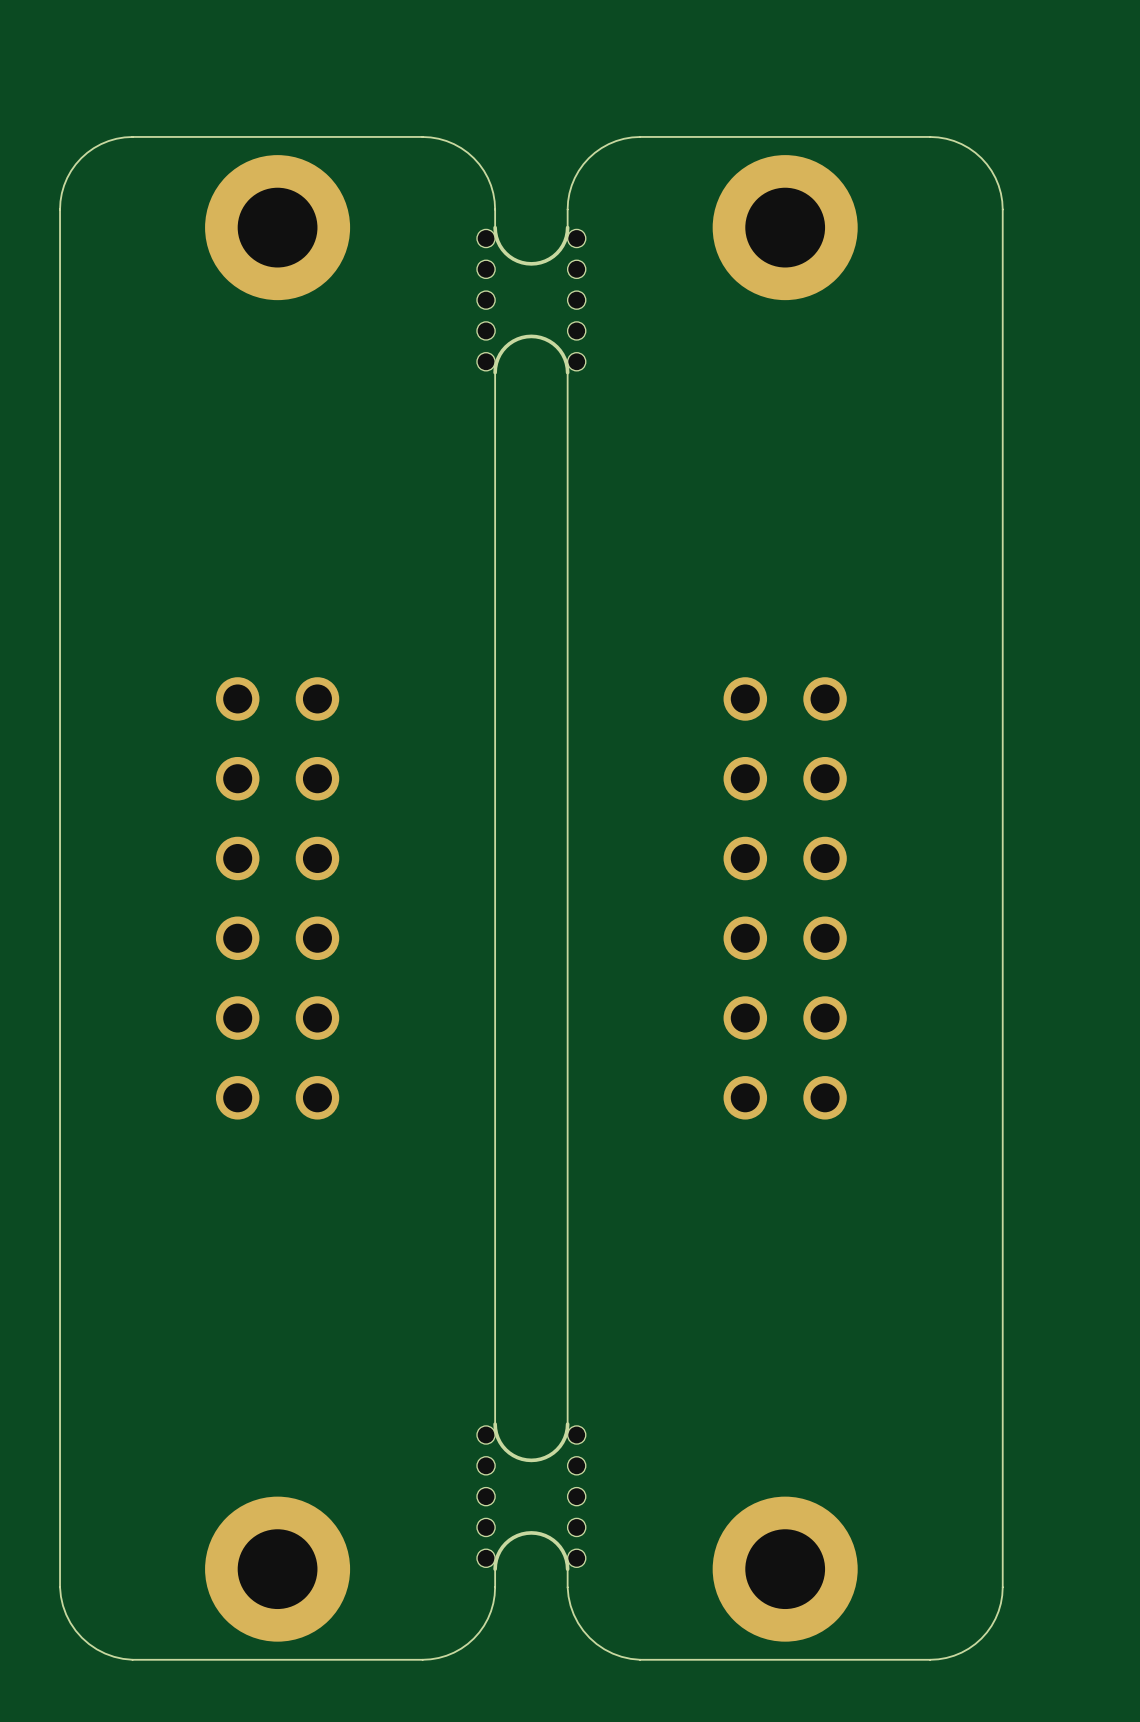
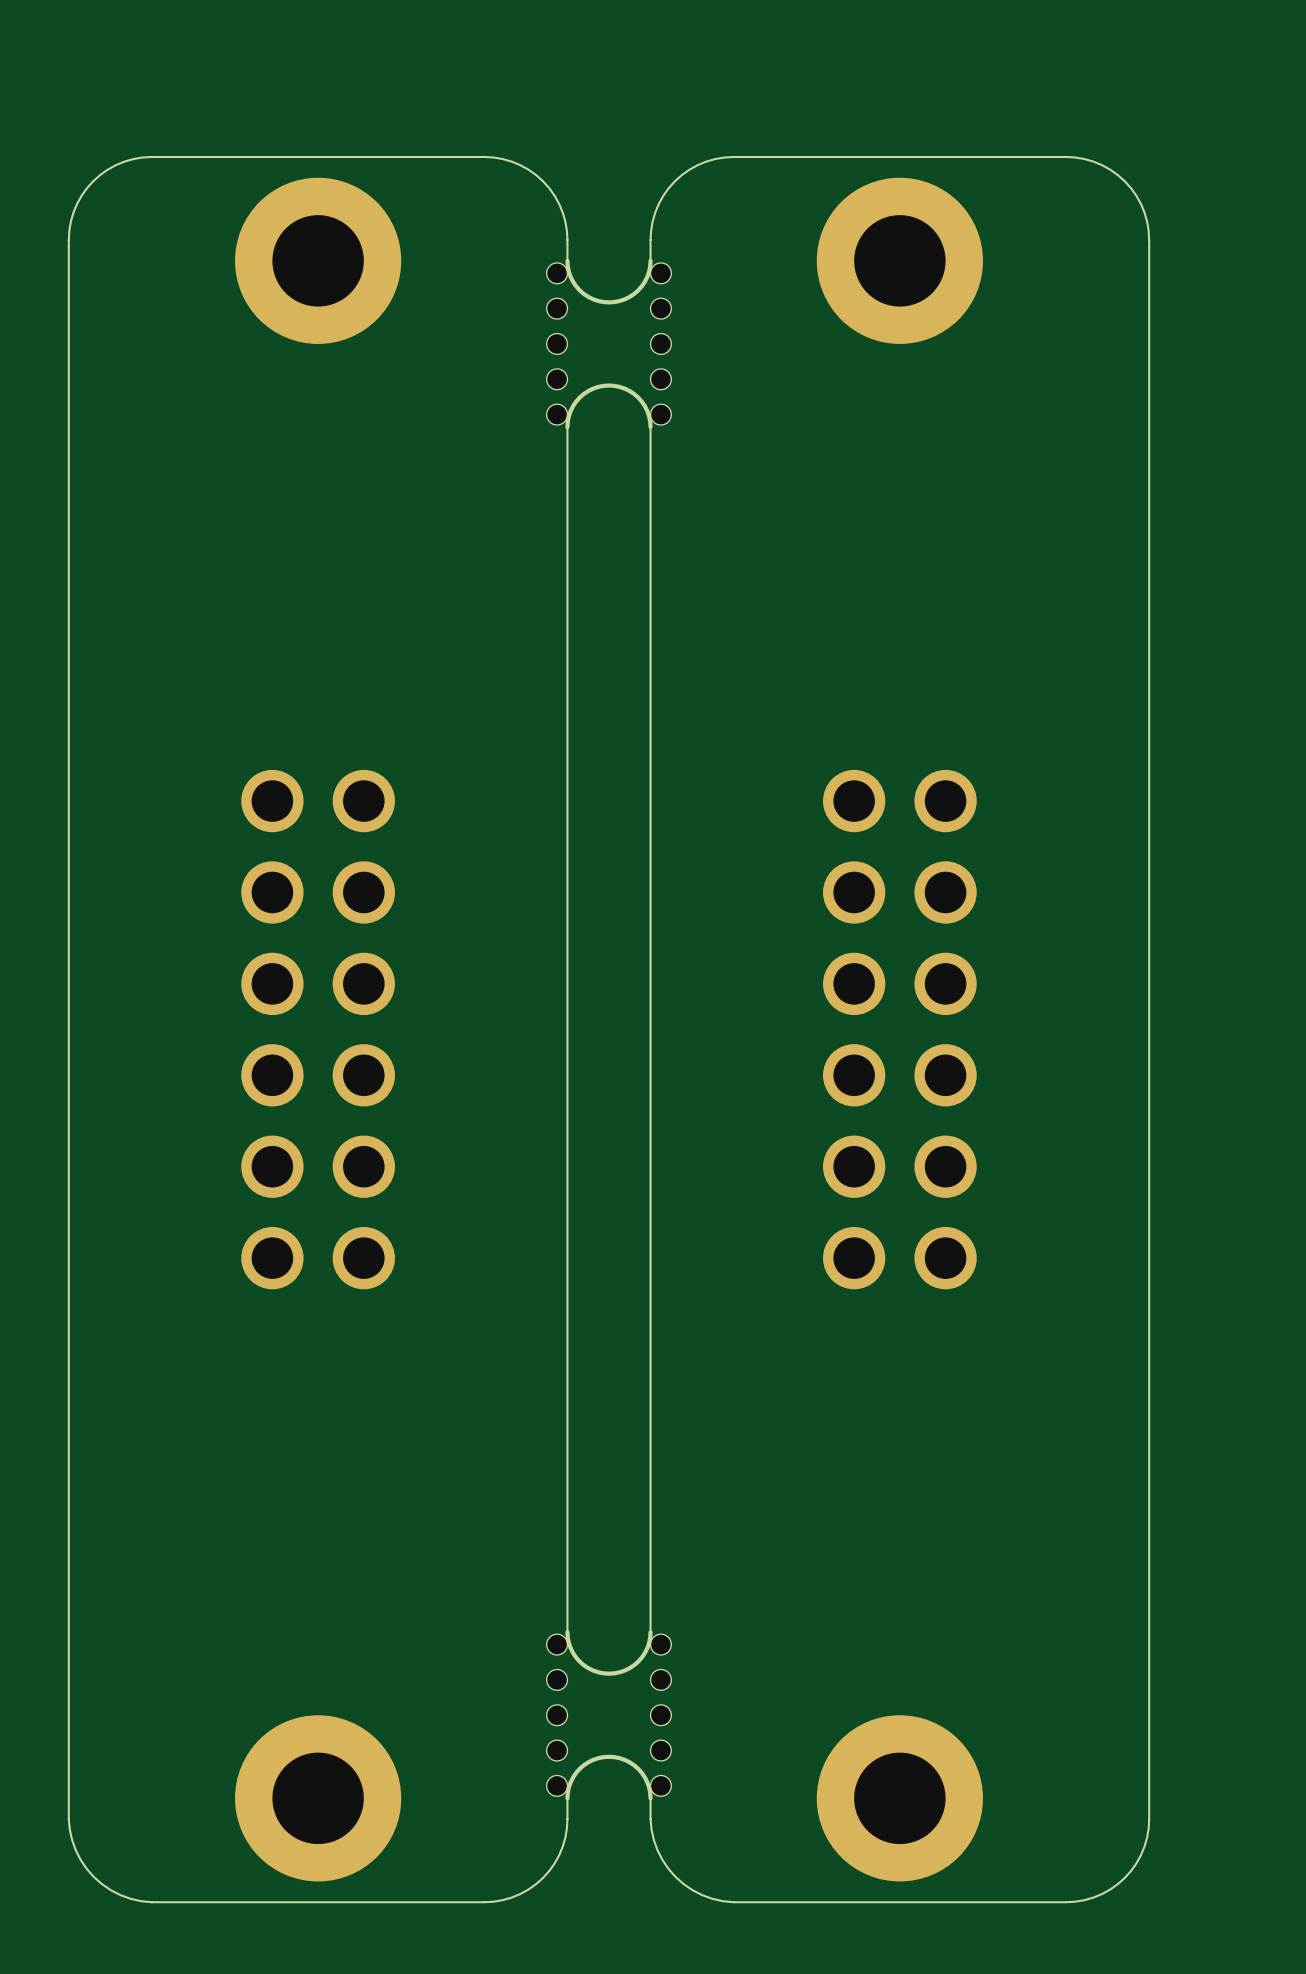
part footprint: [215, 677, 340, 1120] -> [241, 769, 395, 1290]
part footprint: [723, 677, 847, 1120] -> [823, 769, 977, 1290]

